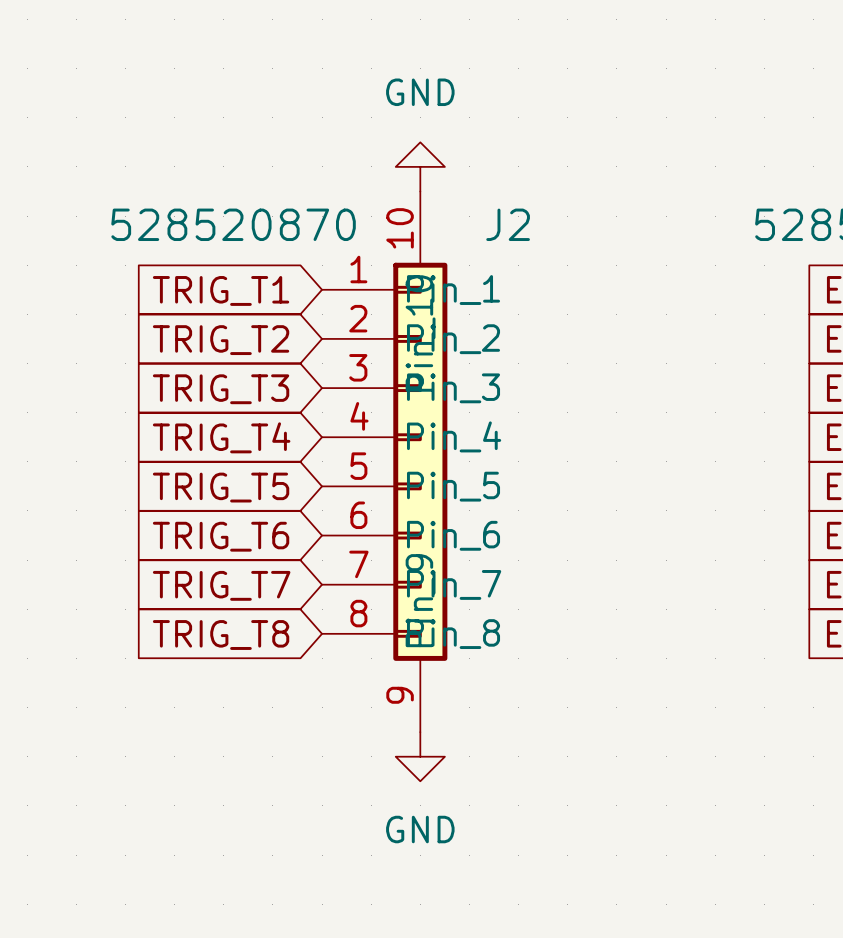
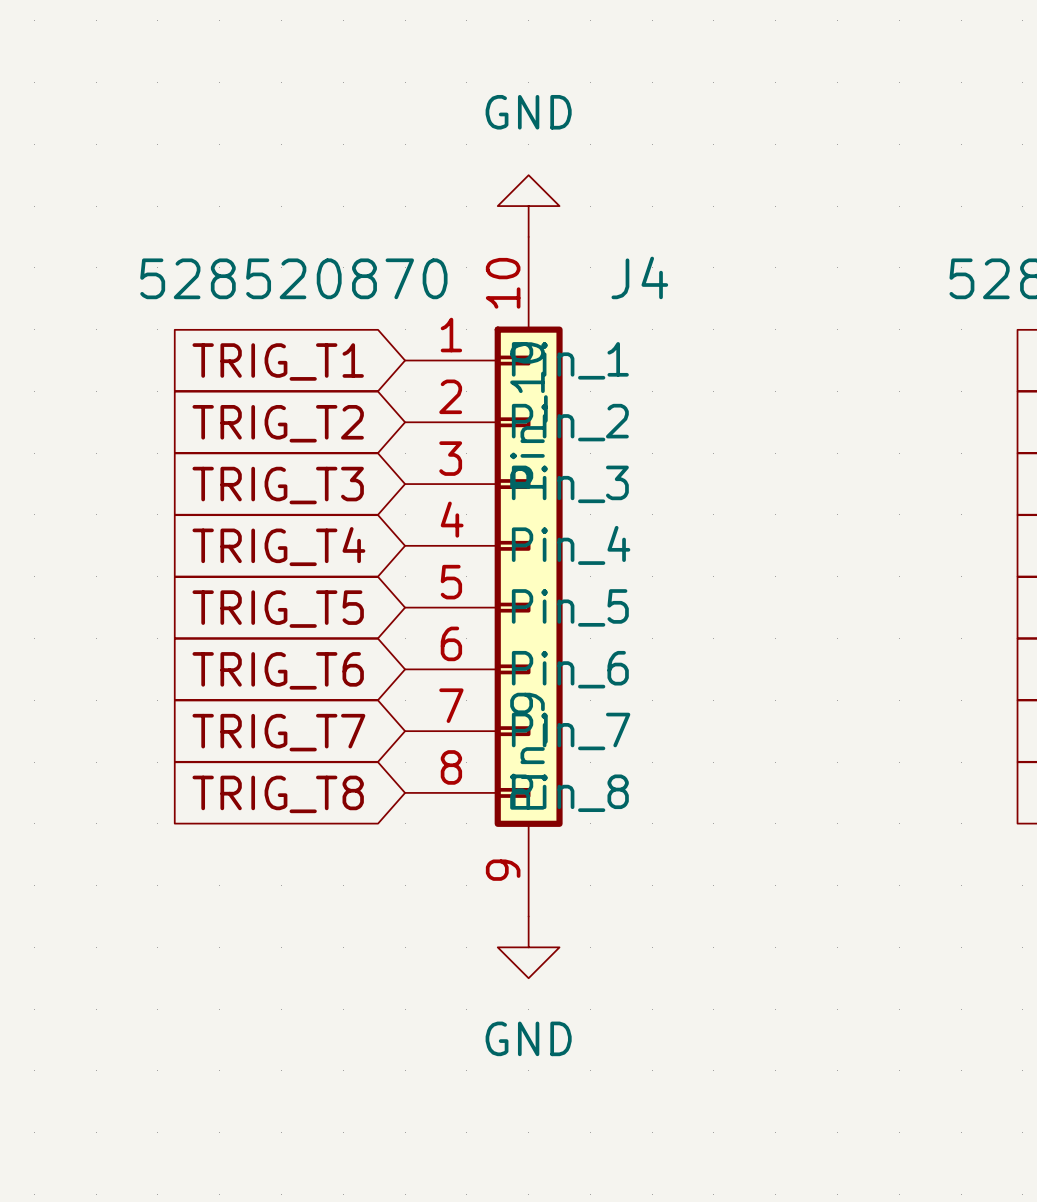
J2 name: J2 (508, 224) -> J4 (639, 277)

